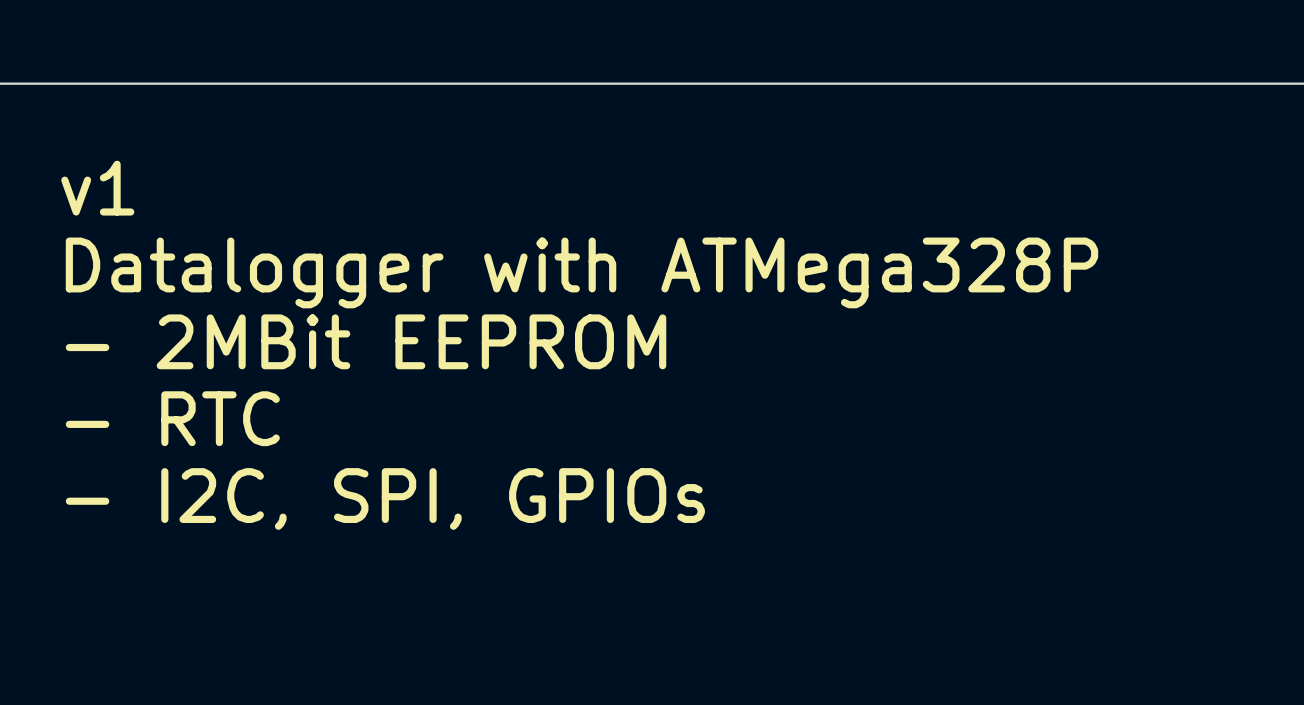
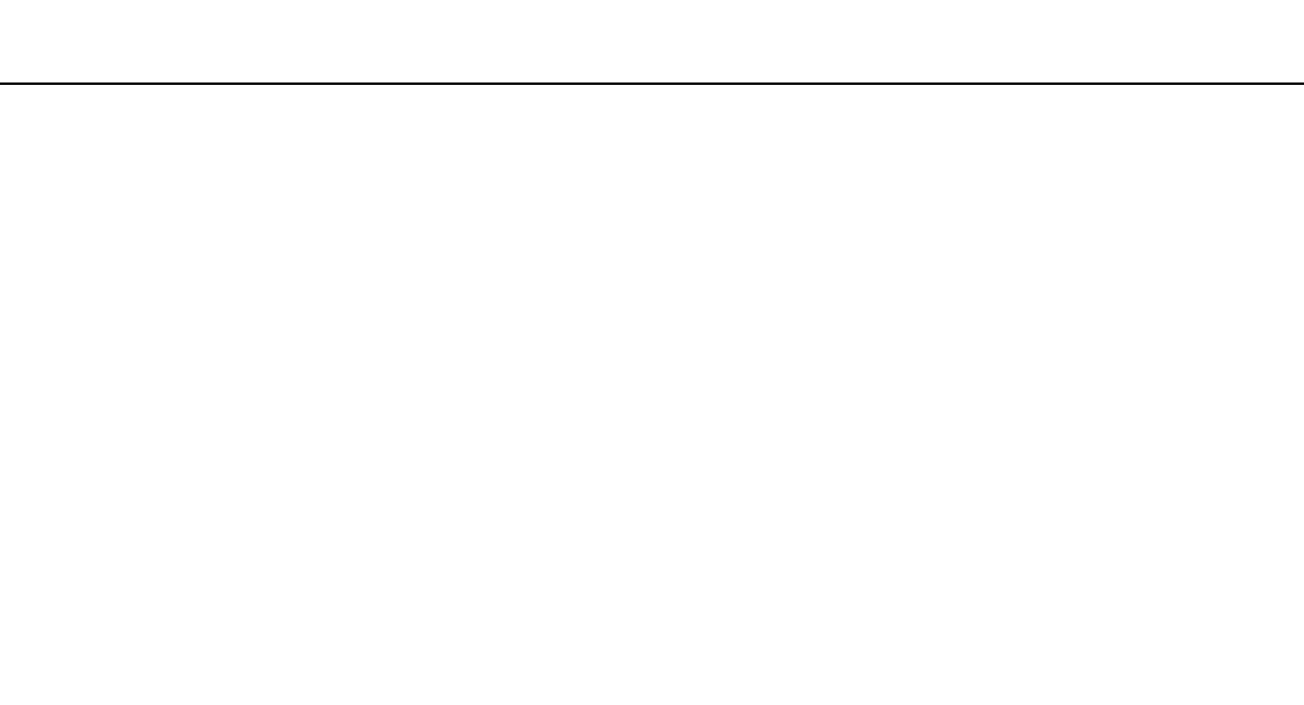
text: v1 (97, 188) -> none
text: Datalogger with ATMega328P (581, 272) -> none
text: - 2MBit EEPROM (366, 341) -> none
text: - RTC (172, 418) -> none
text: - I2C, SPI, GPIOs (385, 498) -> none

